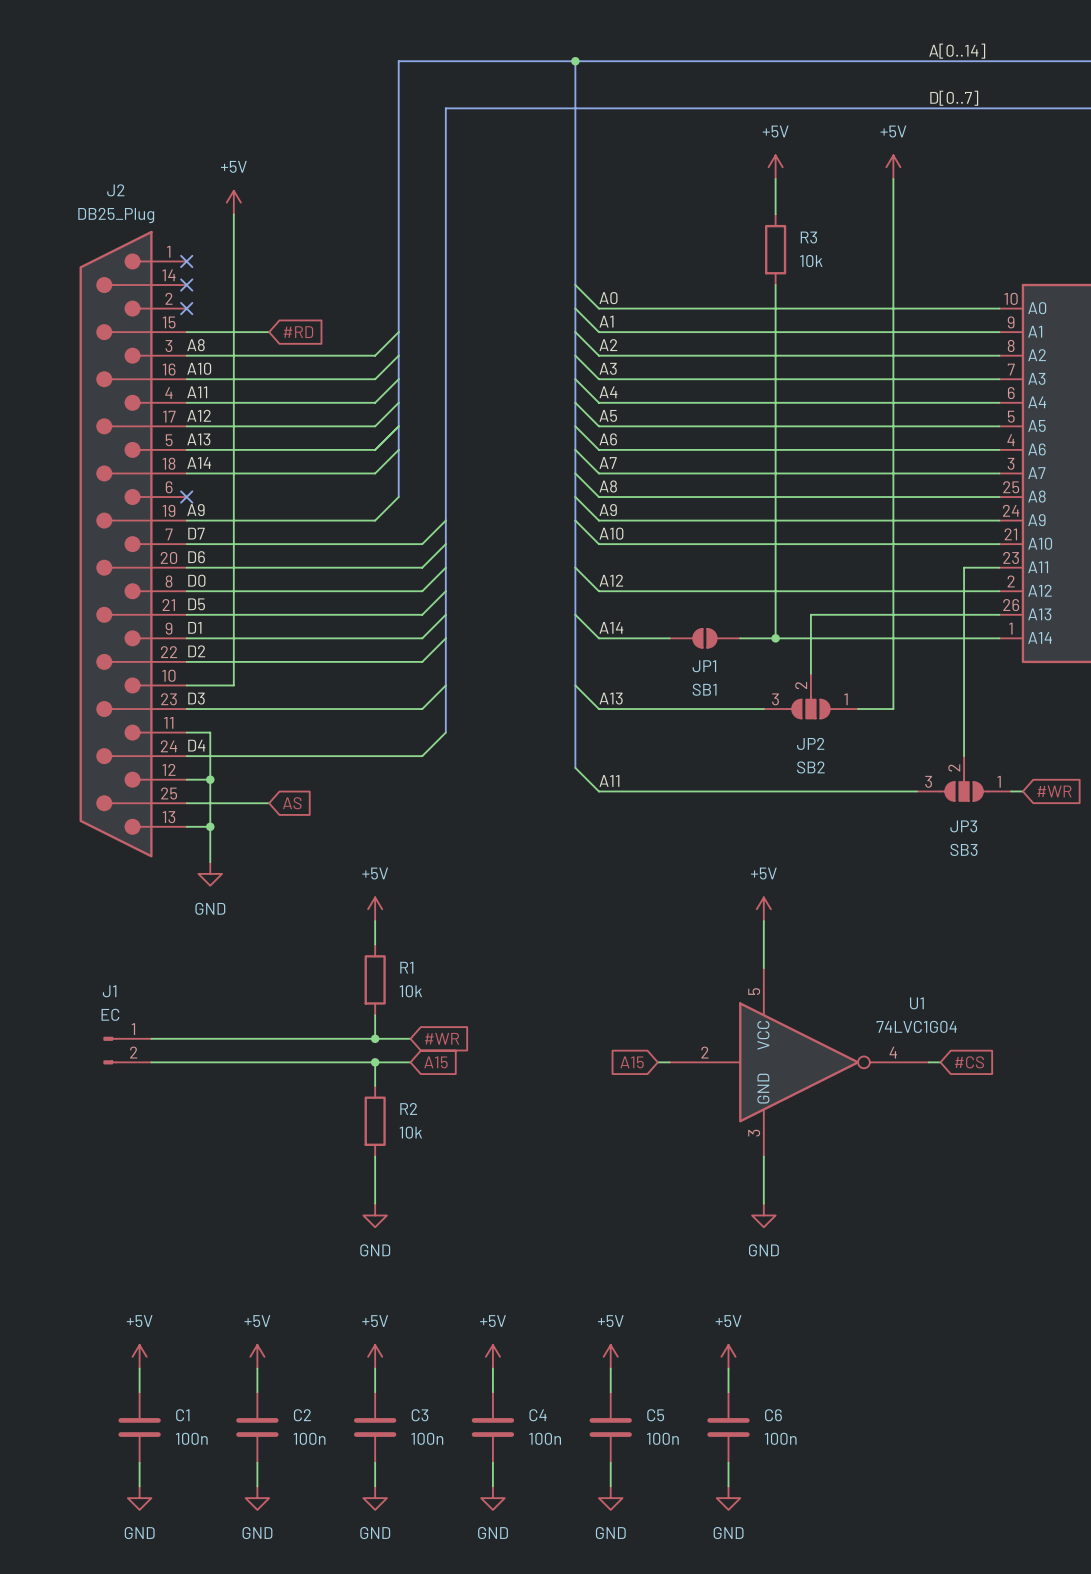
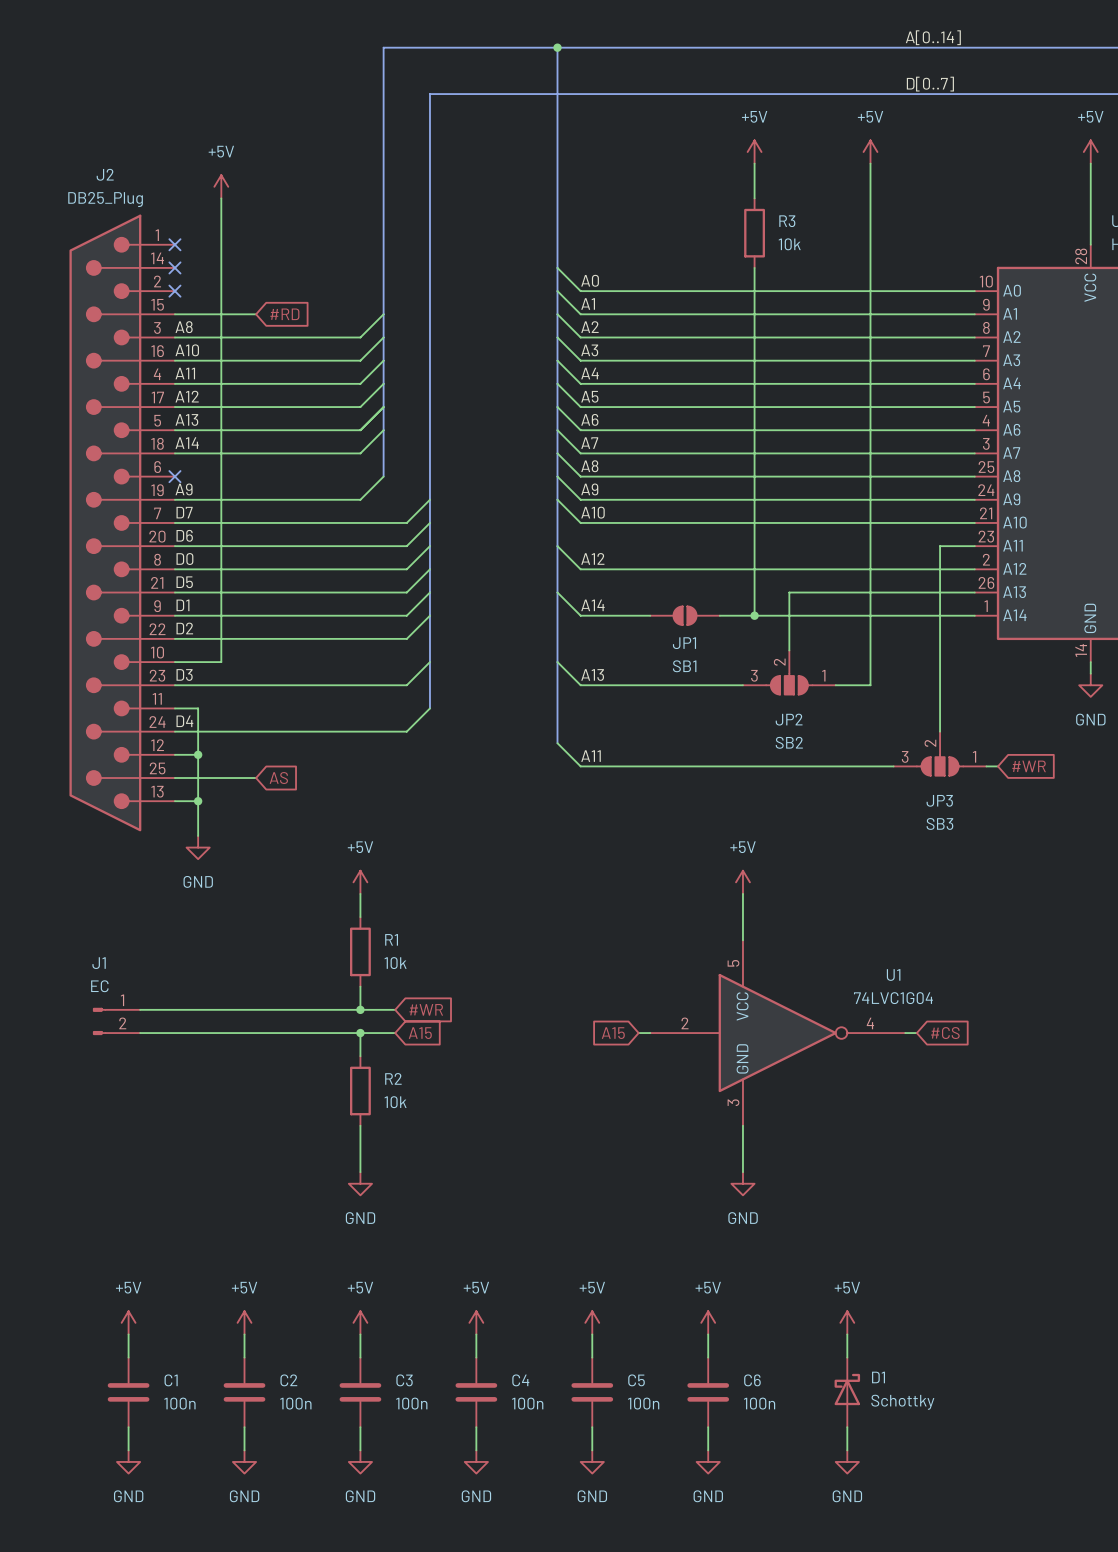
power symbol: none -> +5V (847, 1322)
wire: none -> (847, 1334) (847, 1357)
D1: none -> Schottky (847, 1392)
wire: none -> (847, 1427) (847, 1450)
power symbol: none -> GND (847, 1461)

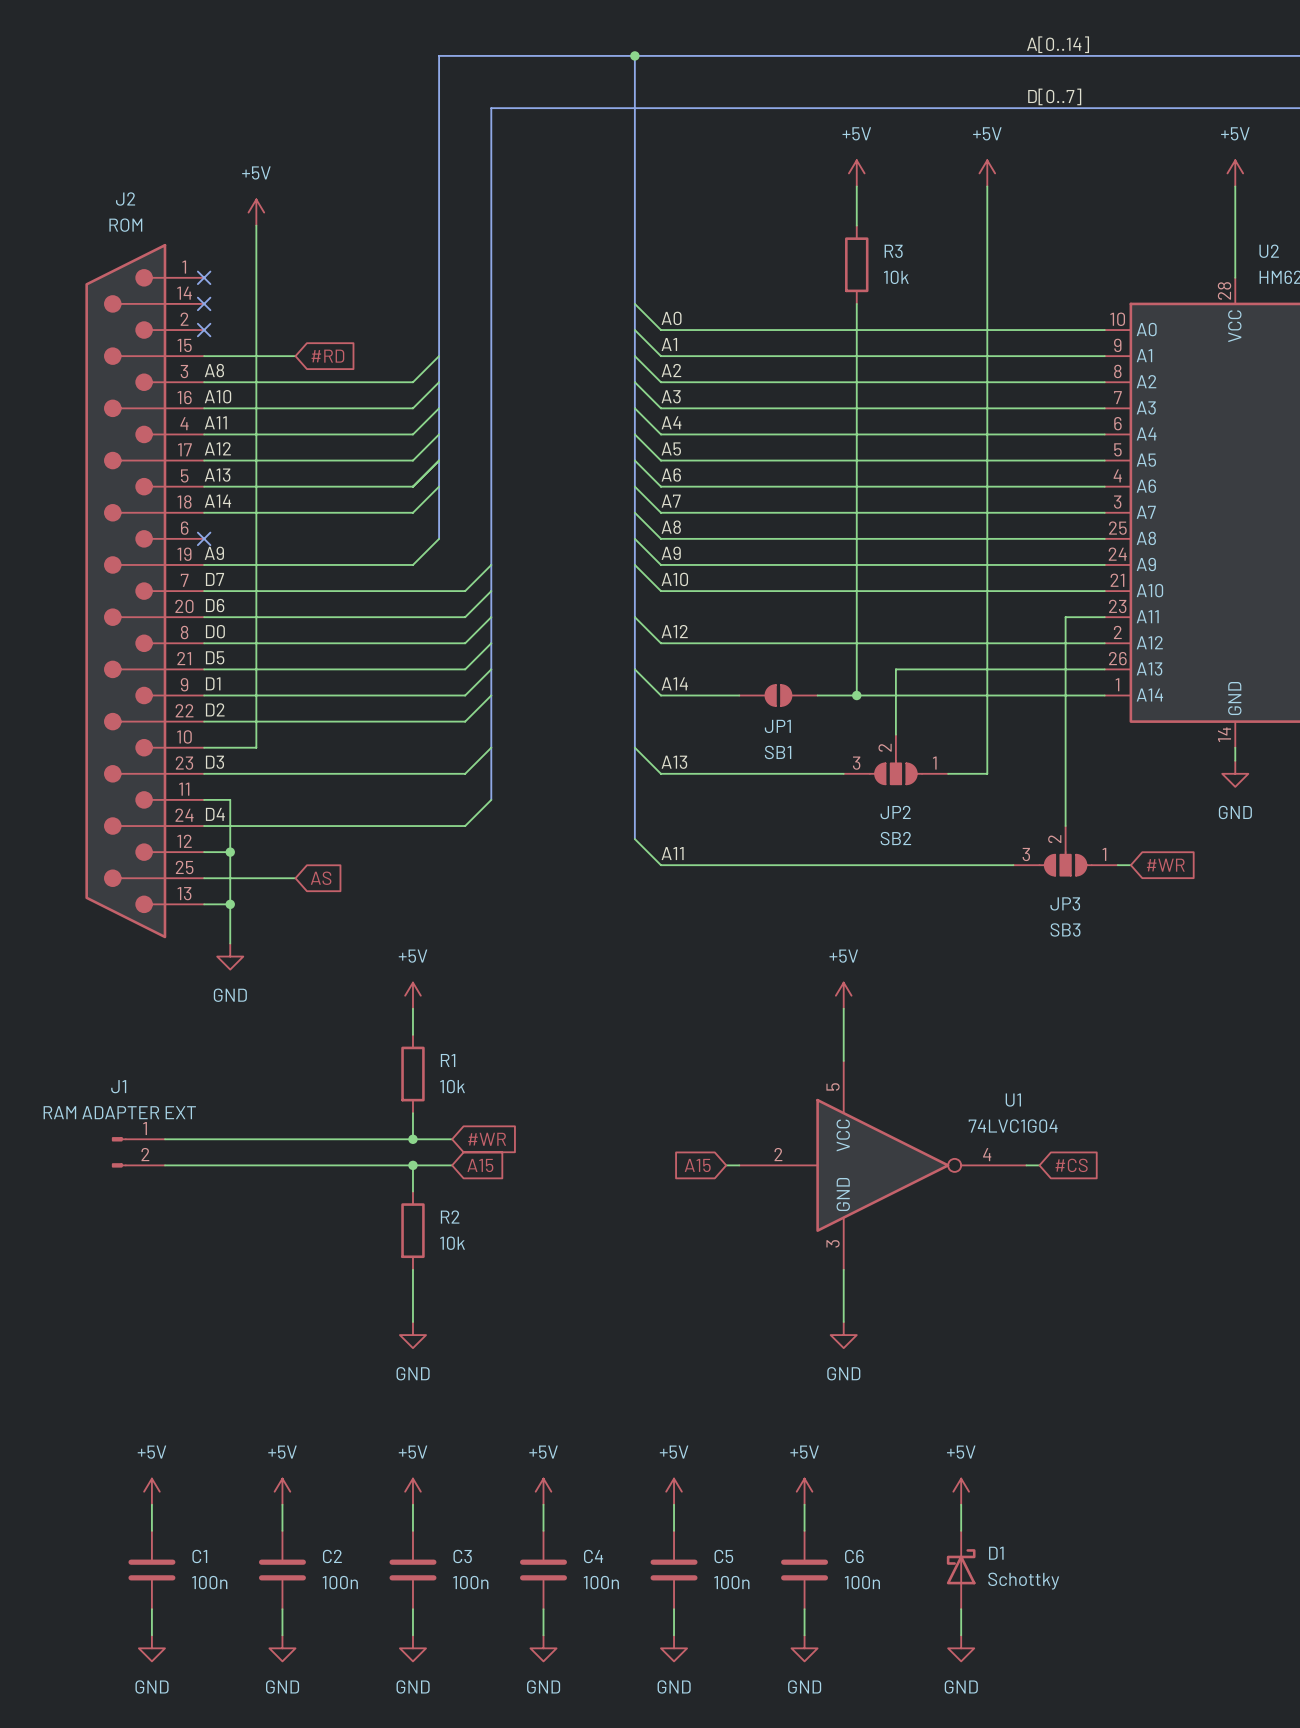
J2 value: DB25_Plug (105, 199) -> ROM (125, 225)
J1 value: EC (99, 986) -> RAM ADAPTER EXT (119, 1112)

